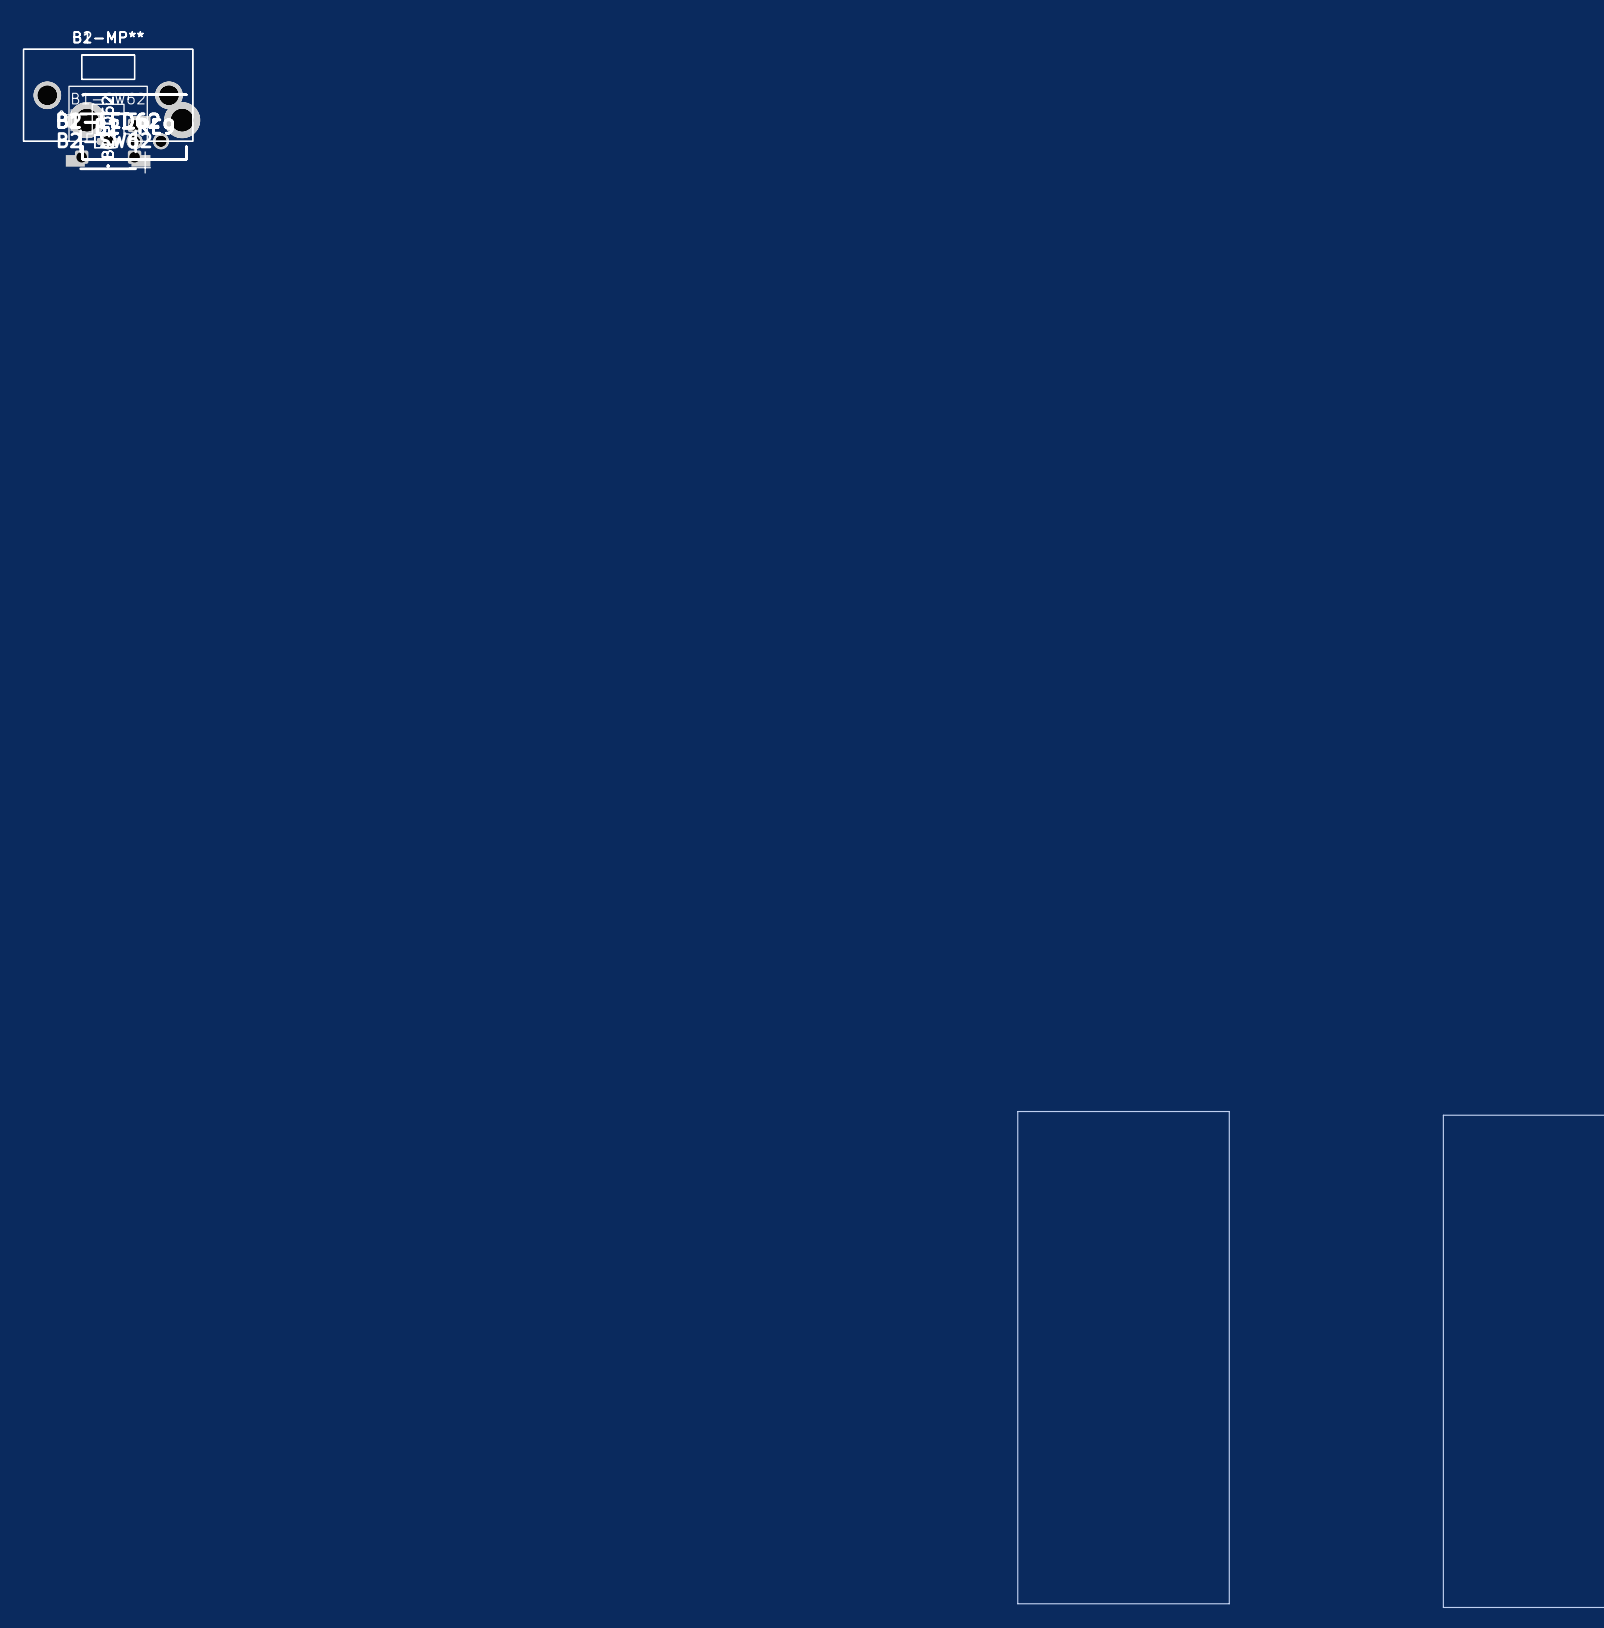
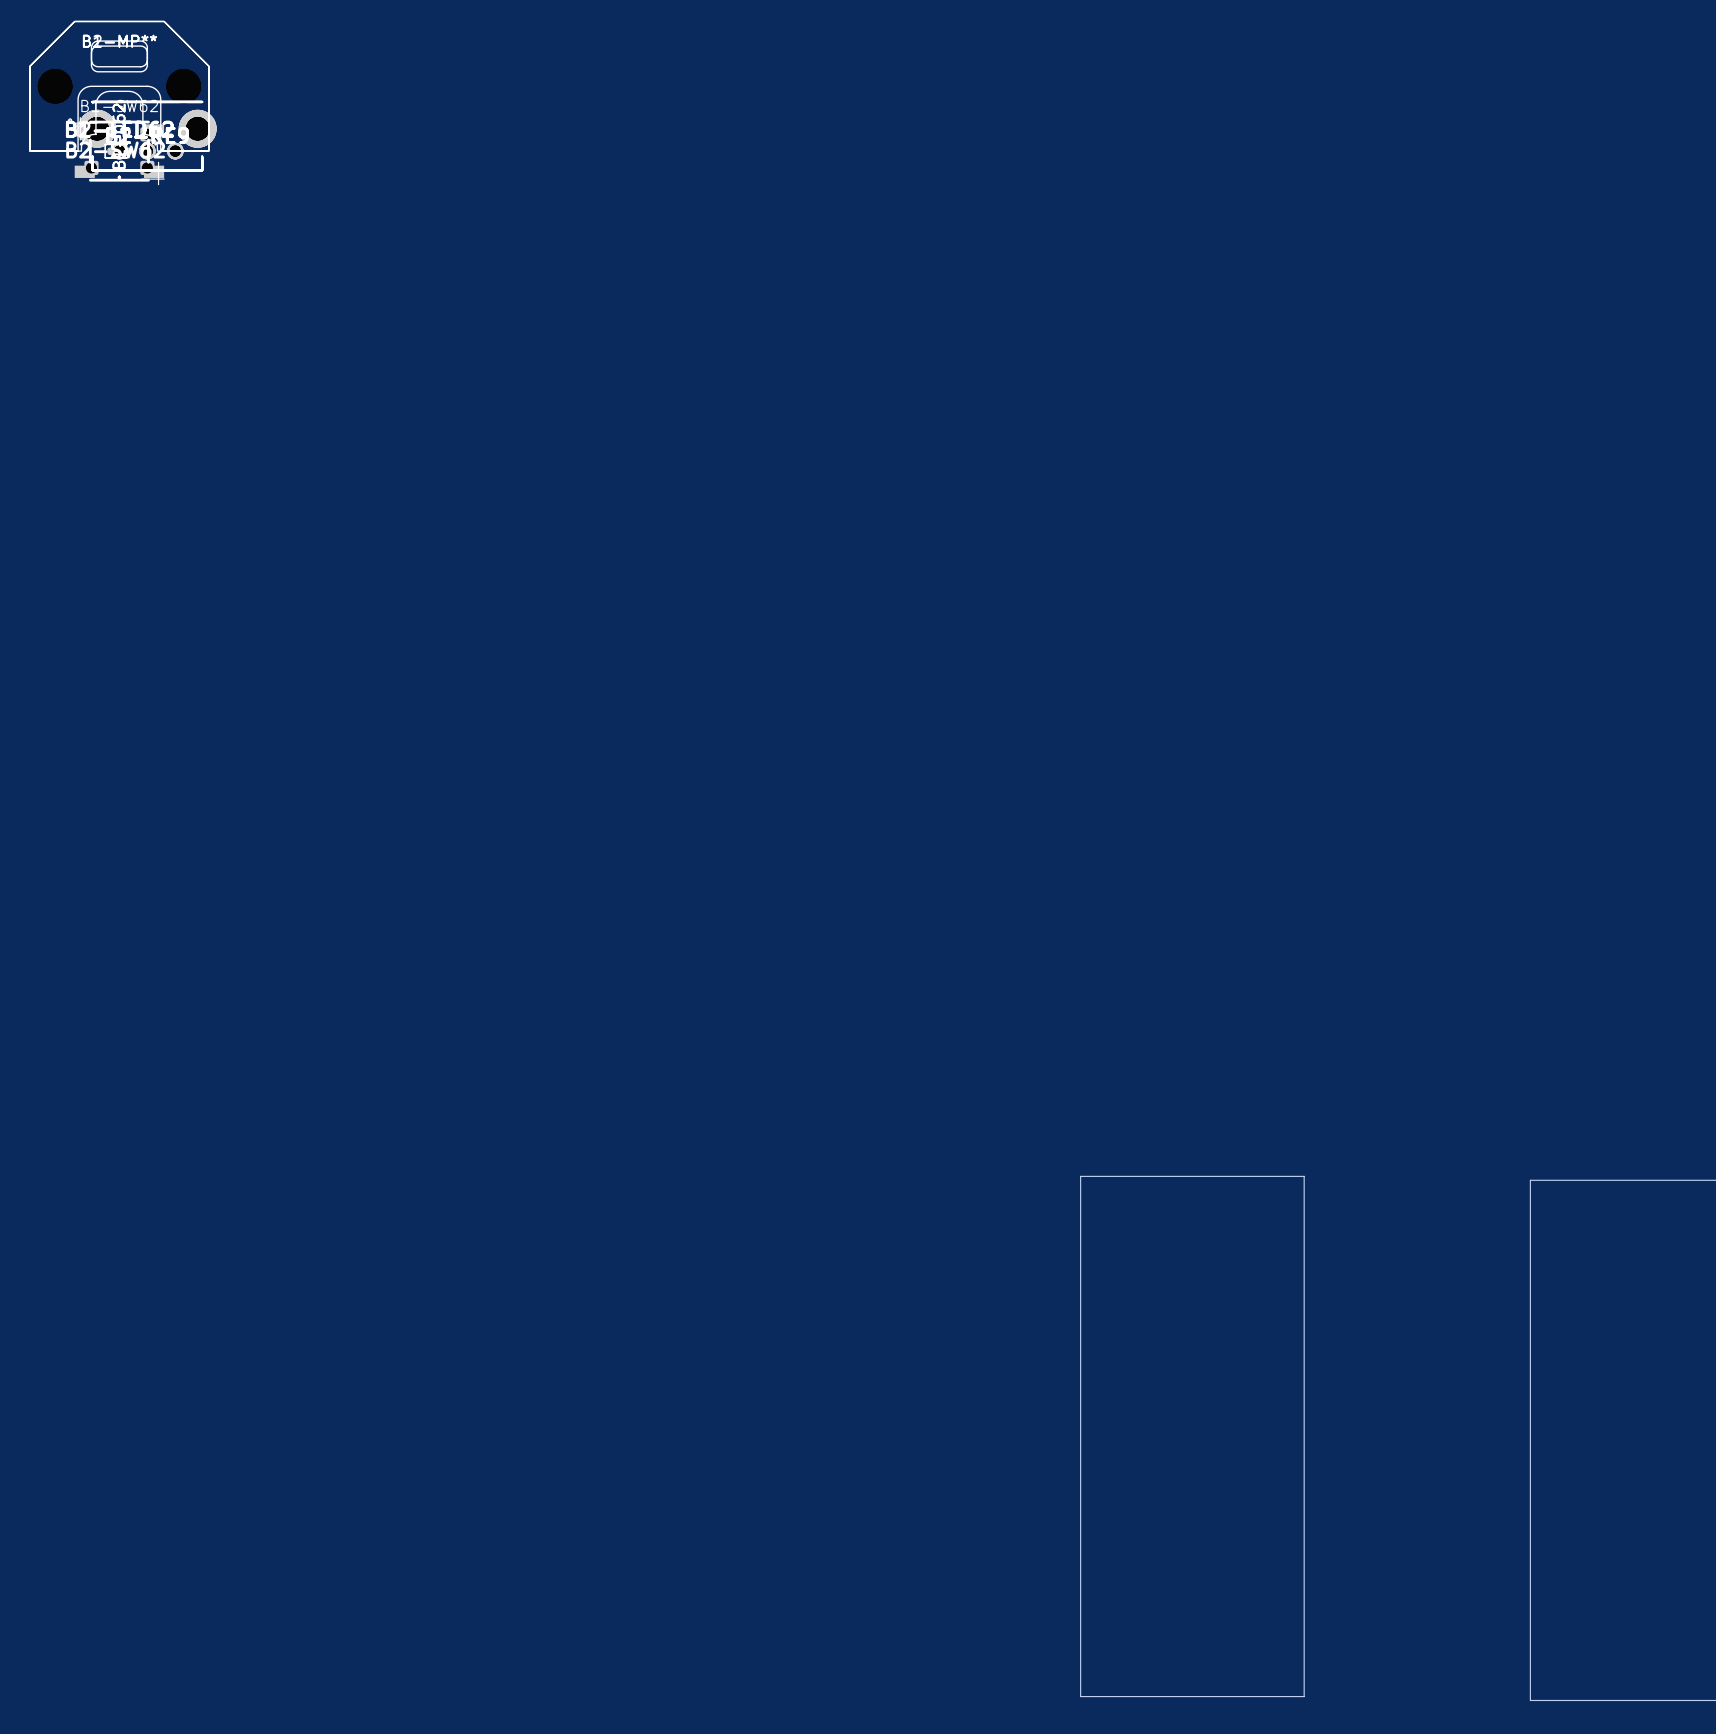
part footprint: [22, 48, 194, 142] -> [29, 20, 210, 152]
part footprint: [22, 48, 194, 142] -> [29, 20, 210, 152]

